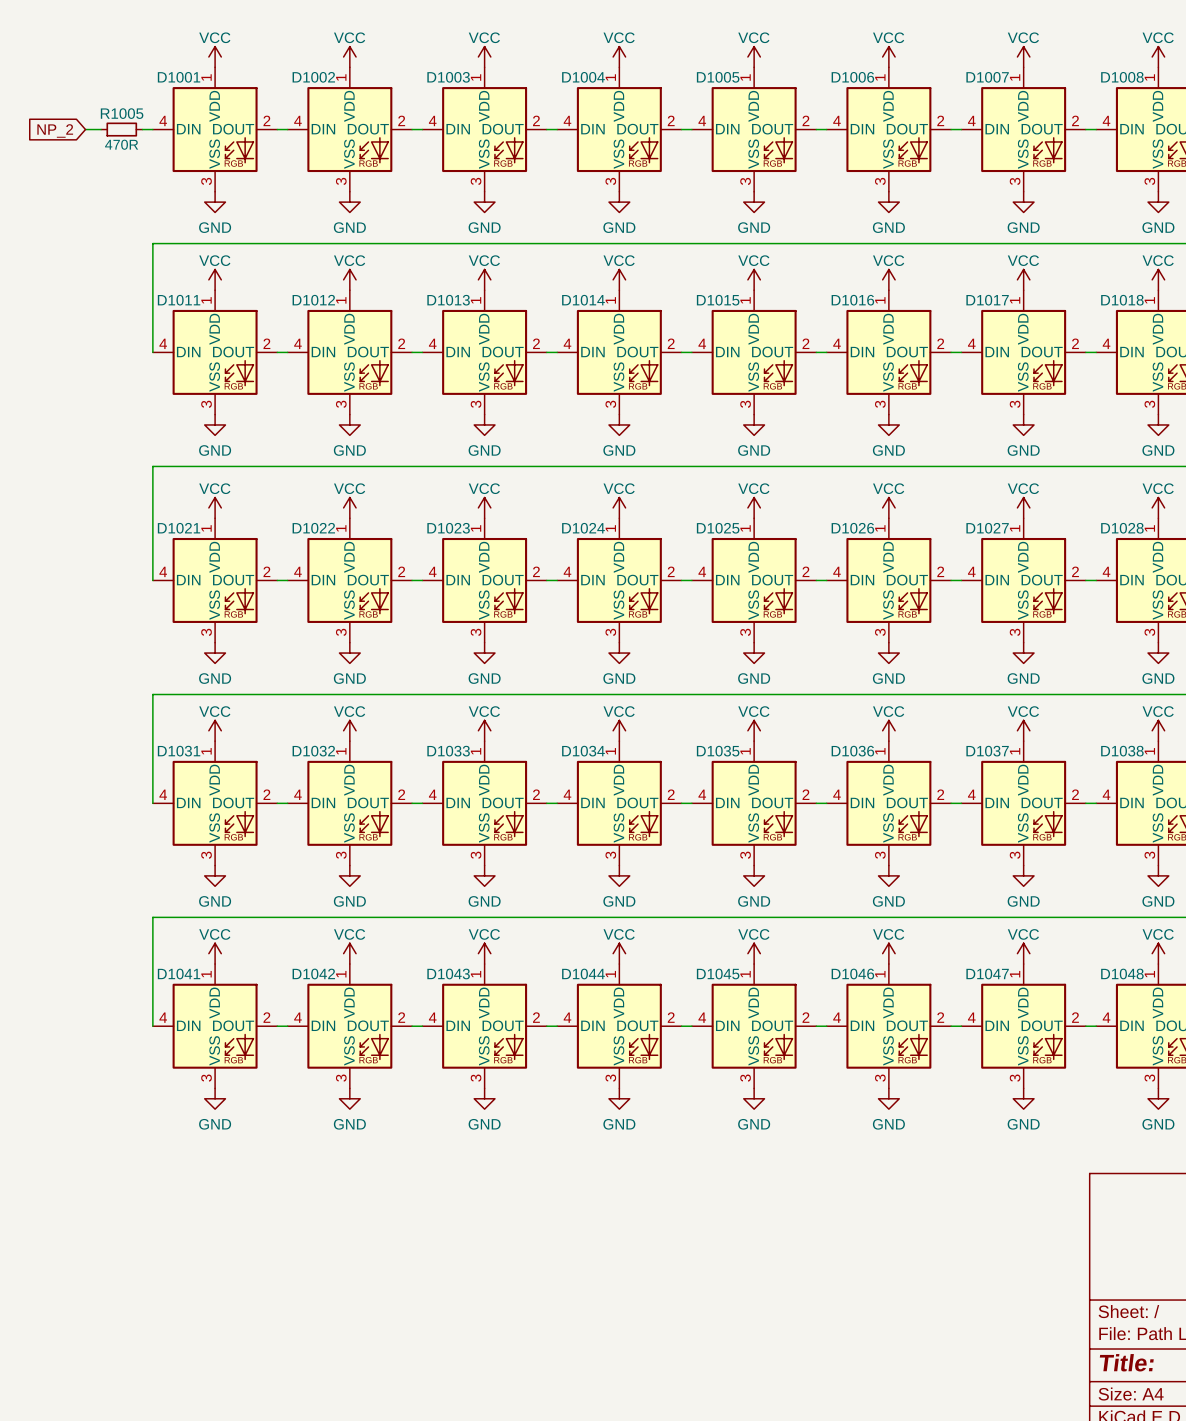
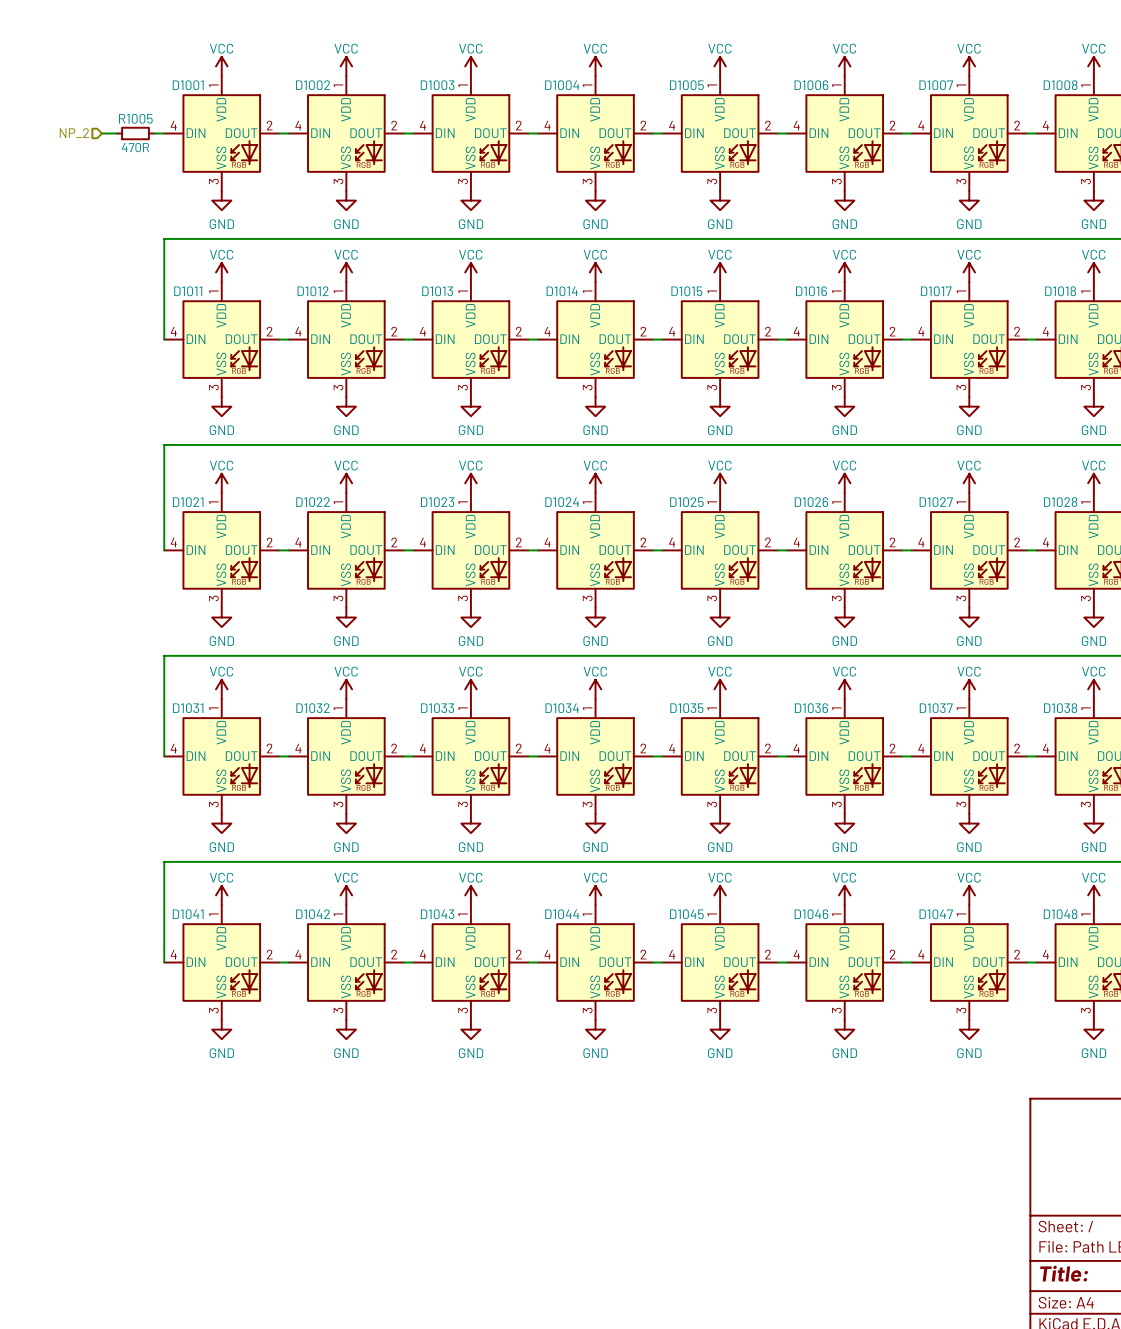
hierarchical label: none -> NP_2 (74, 133)
global label: NP_2 (55, 130) -> none

